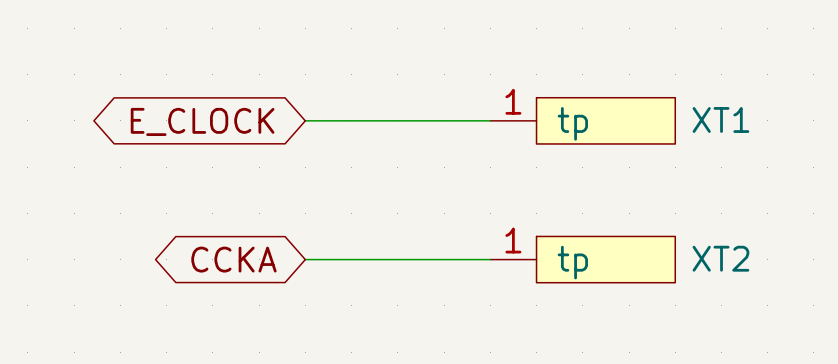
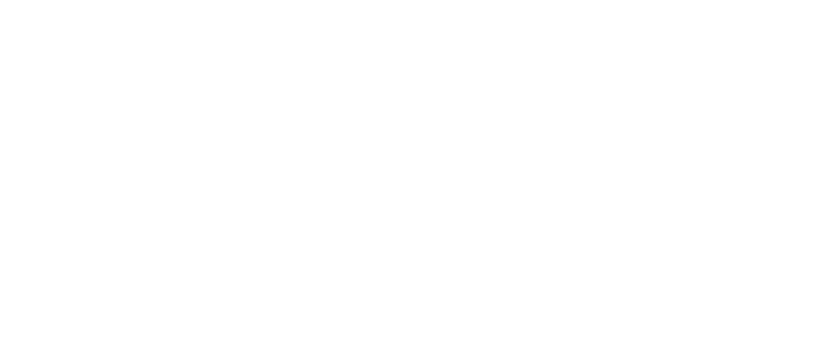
wire: (305, 120) (490, 120) -> none
XT1: (582, 120) -> none
global label: E_CLOCK (202, 121) -> none
global label: CCKA (233, 259) -> none
wire: (305, 259) (490, 259) -> none
XT2: (582, 259) -> none

